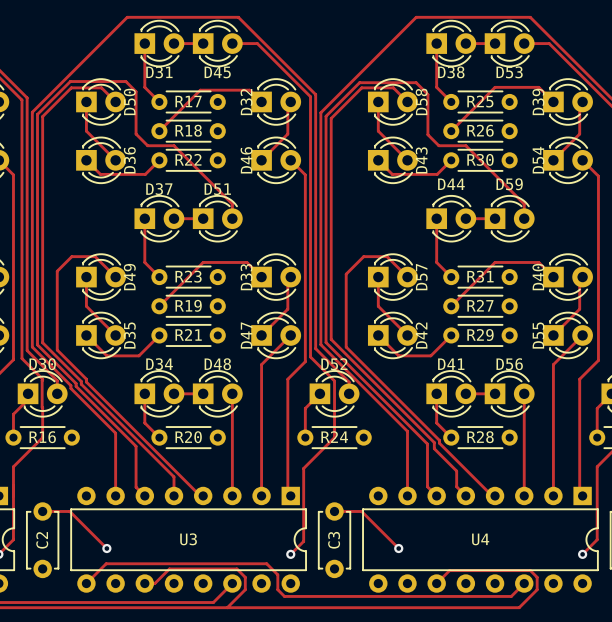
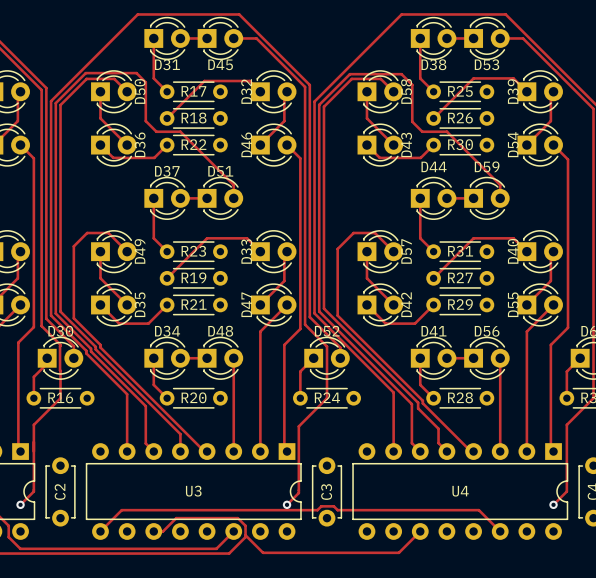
track: (42, 511) (69, 511) (106, 548) -> none
track: (334, 511) (361, 511) (398, 548) -> none
via: (106, 548) -> none
via: (398, 548) -> none
track: (106, 563) (266, 563) (277, 574) (277, 589) (284, 596) (511, 596) (524, 583) -> (118, 513) (121, 510) (317, 510) (321, 506) (333, 506) (337, 510) (478, 510) (500, 531)
track: (436, 583) (449, 570) (530, 570) (537, 577) (537, 589) (519, 607) (227, 607) -> (420, 531) (398, 552) (263, 552) (245, 535)

